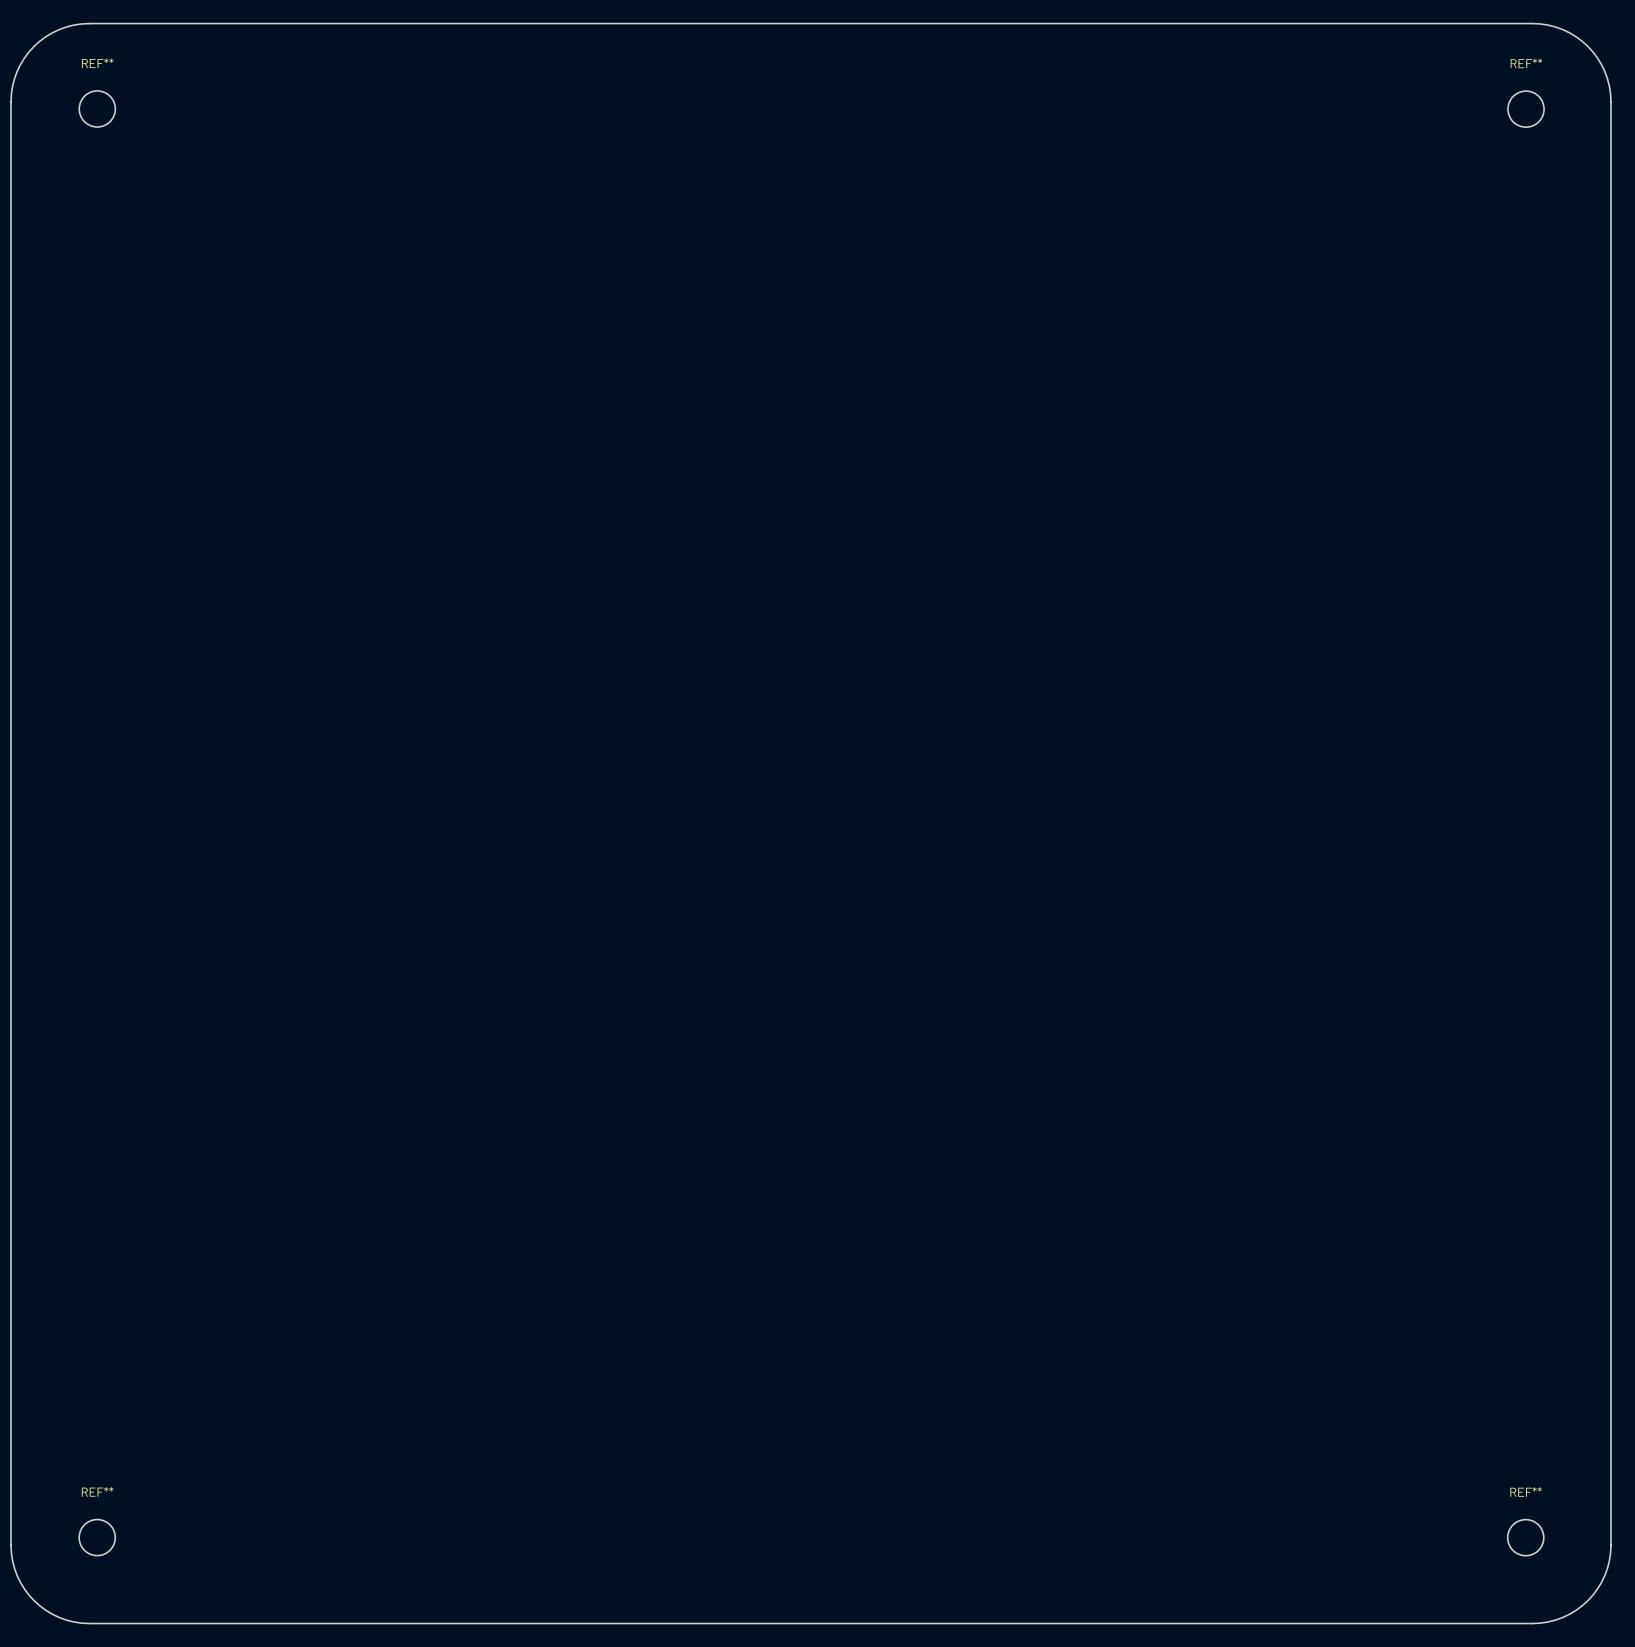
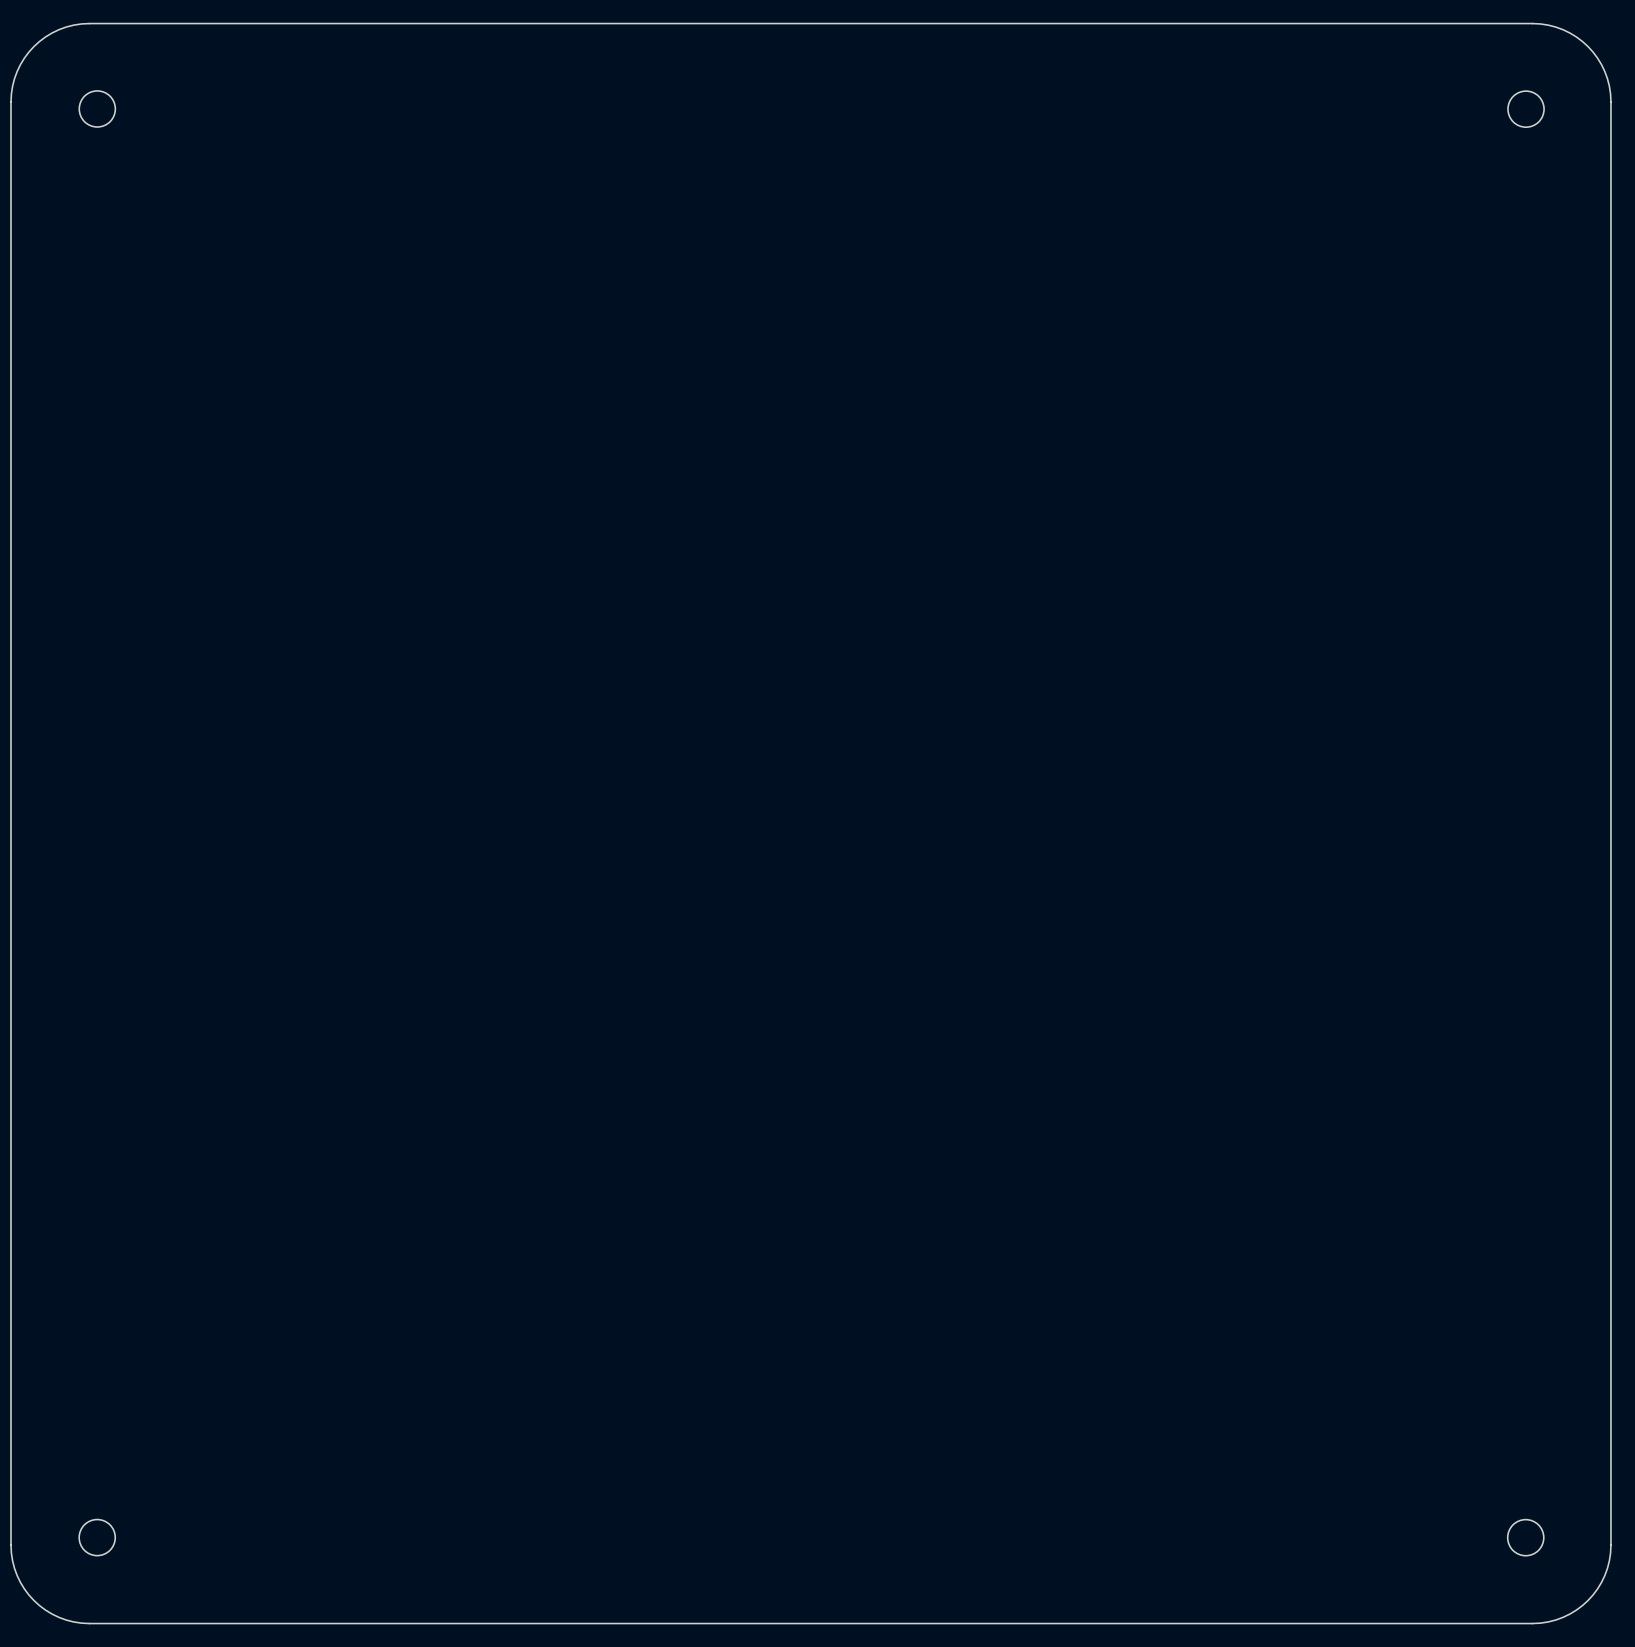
REF** name: REF** (97, 63) -> none
REF** name: REF** (1526, 63) -> none
REF** name: REF** (97, 1491) -> none
REF** name: REF** (1526, 1491) -> none

